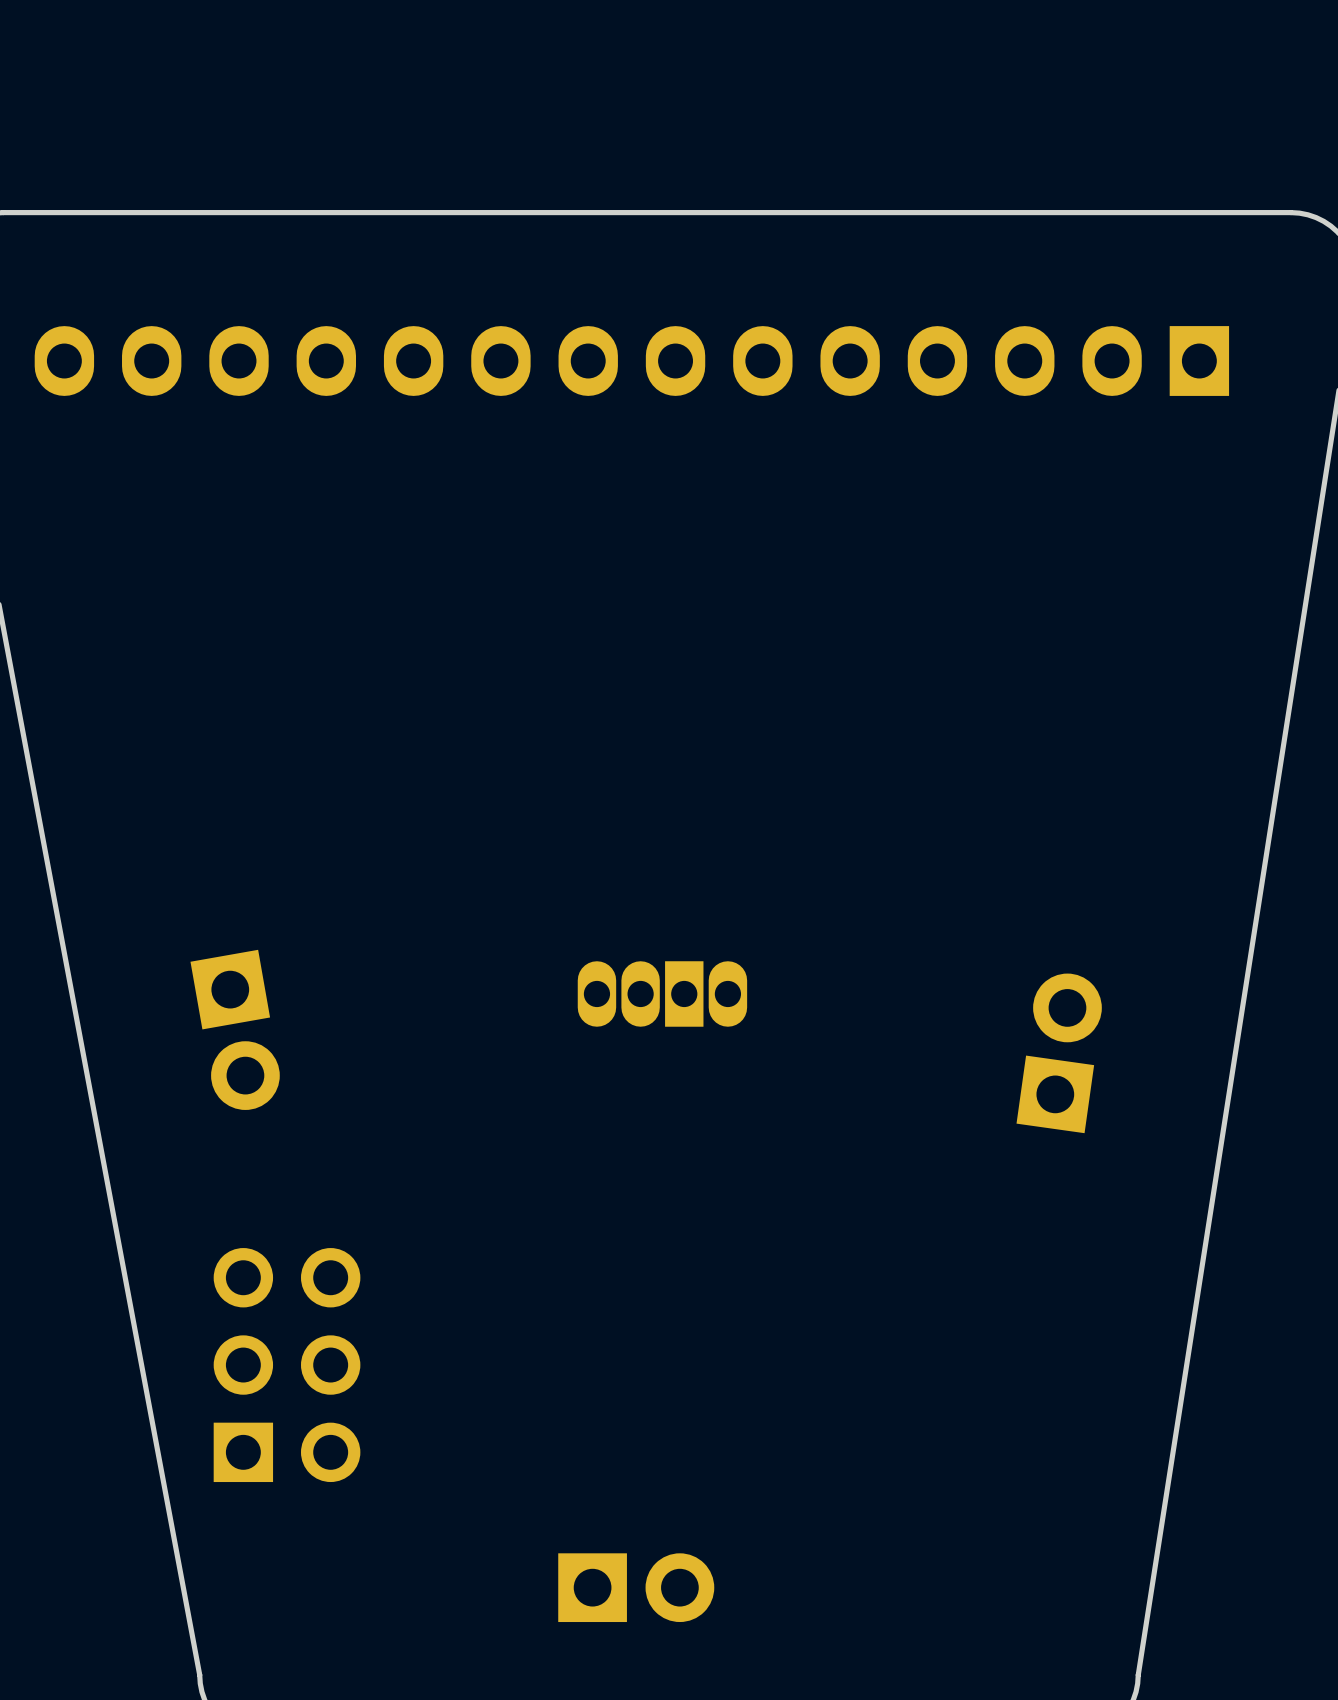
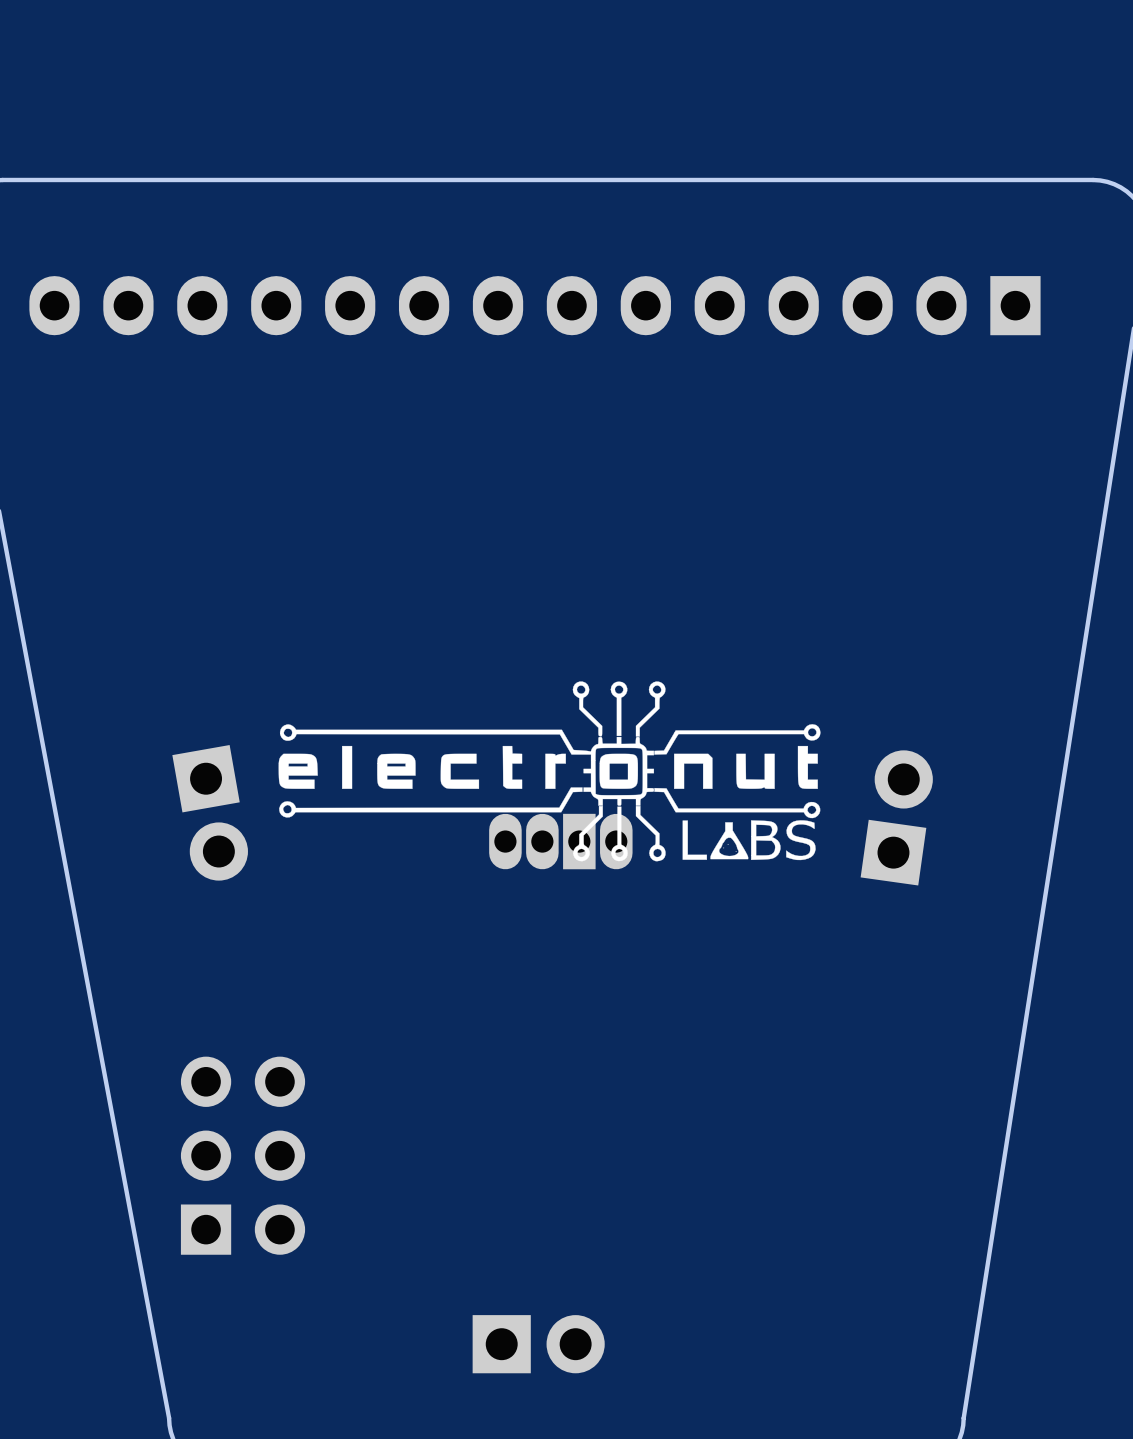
drawing: none -> [278, 681, 821, 862]
part position: (235, 1029) -> (210, 812)
part position: (1059, 1053) -> (896, 817)

